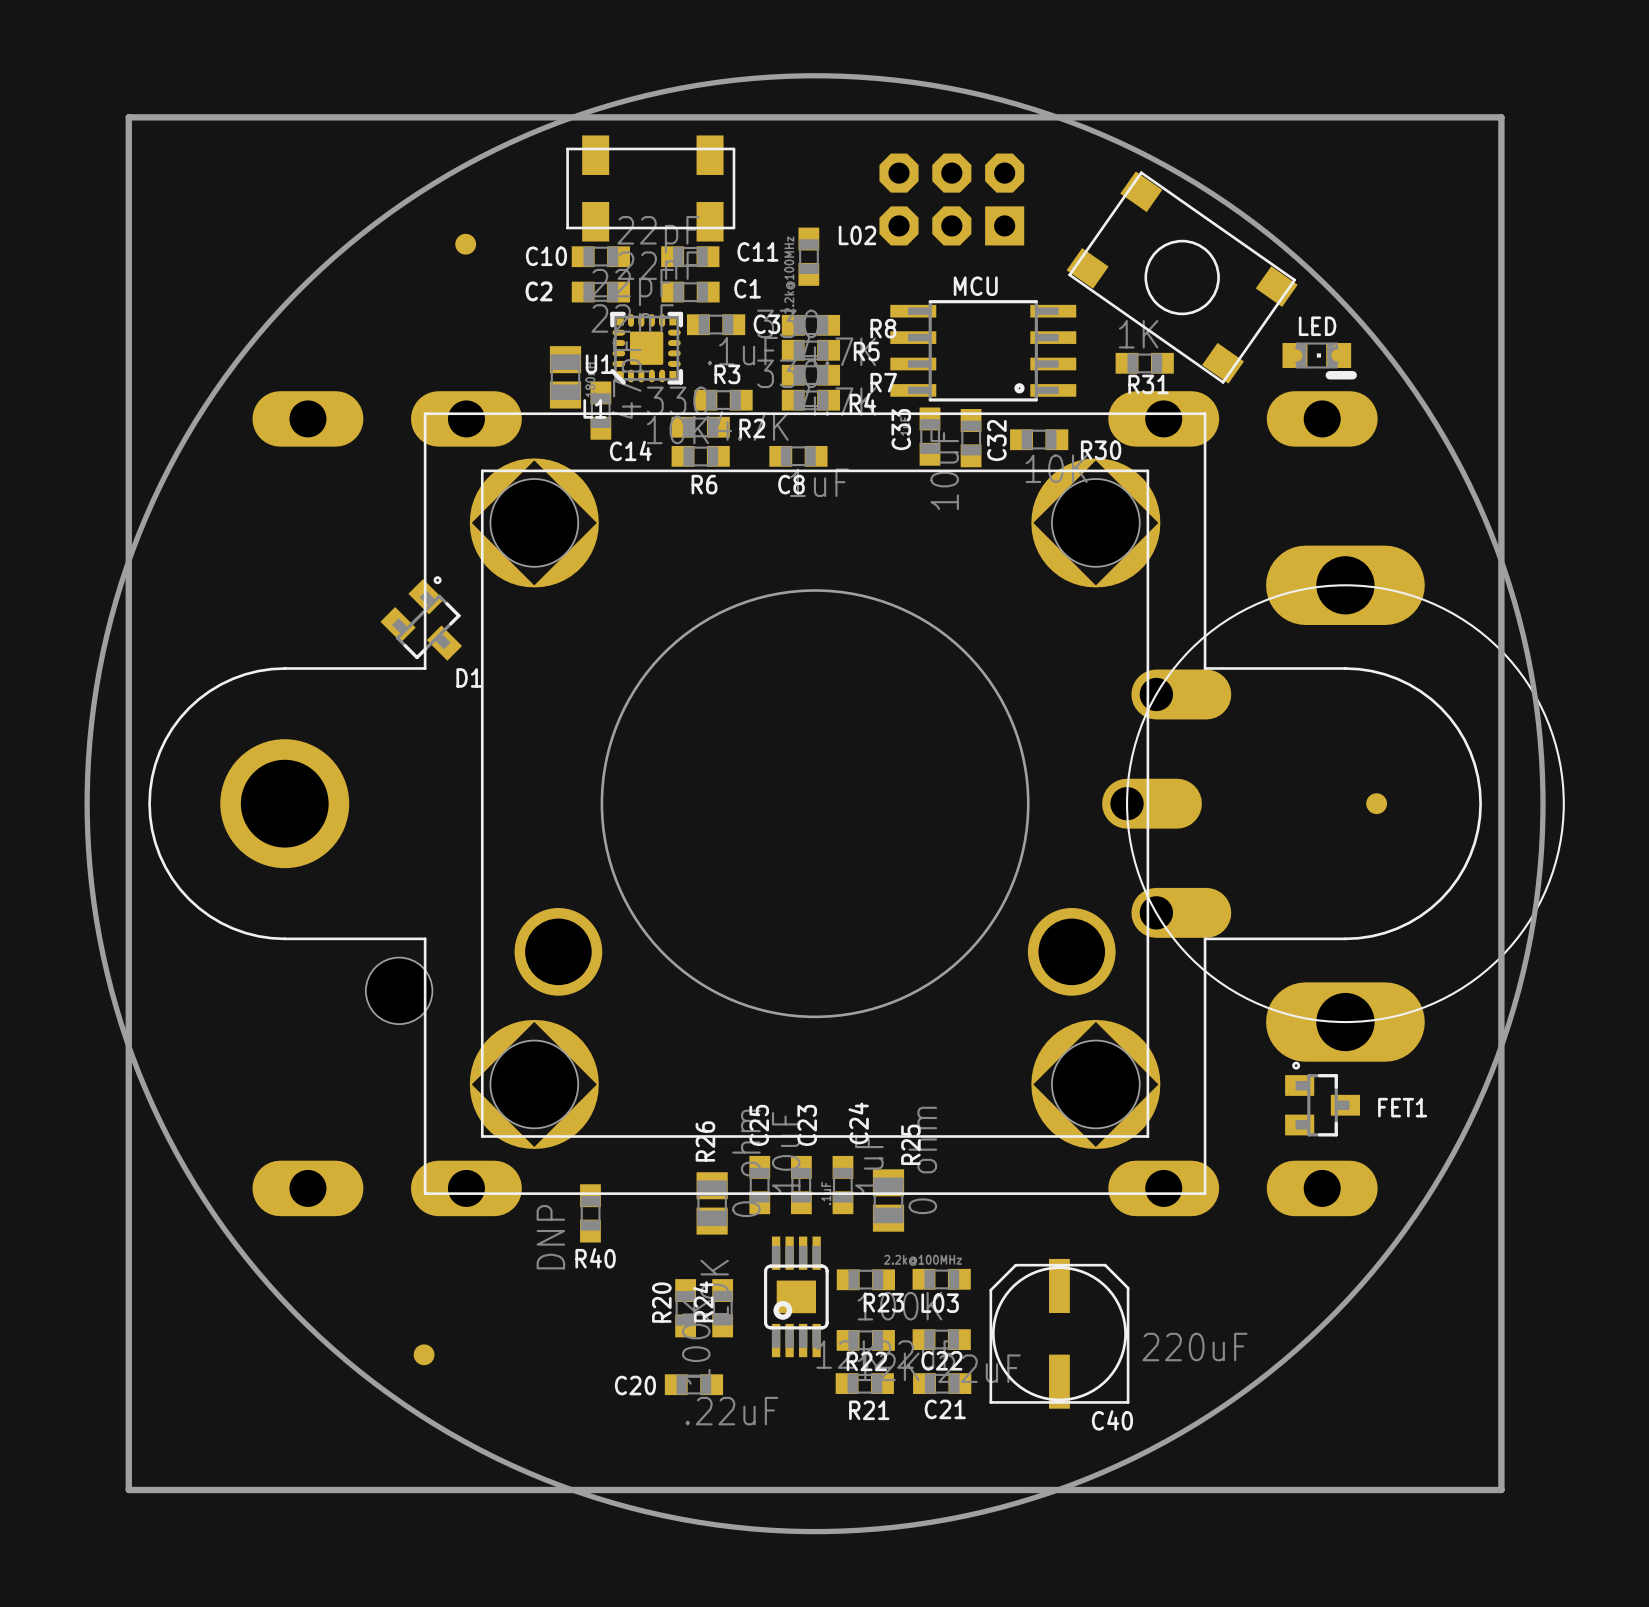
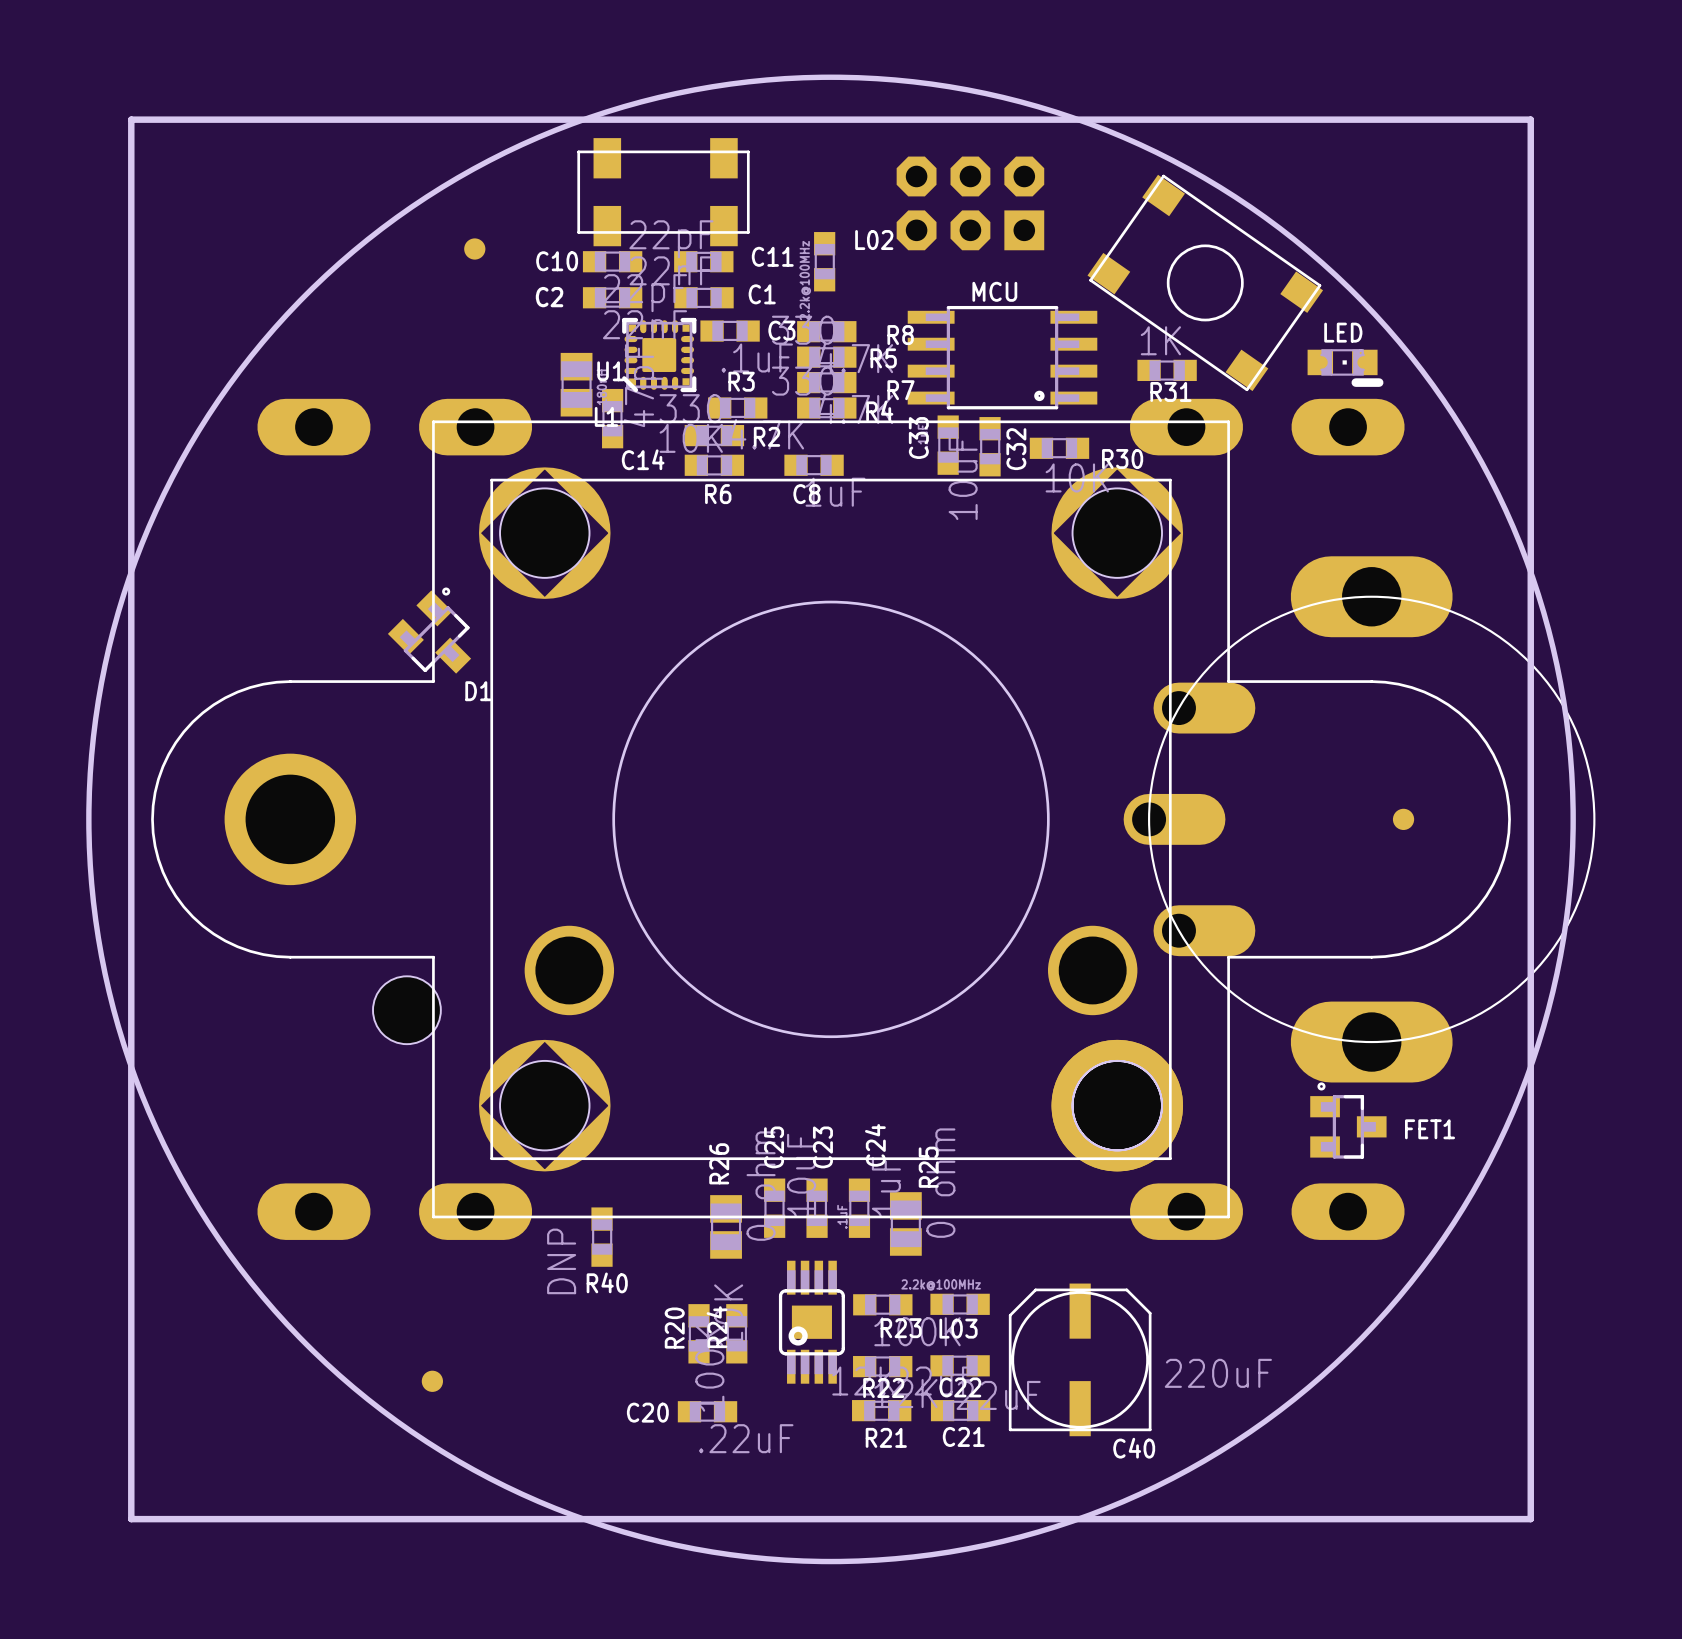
part: none -> (1117, 1105)

